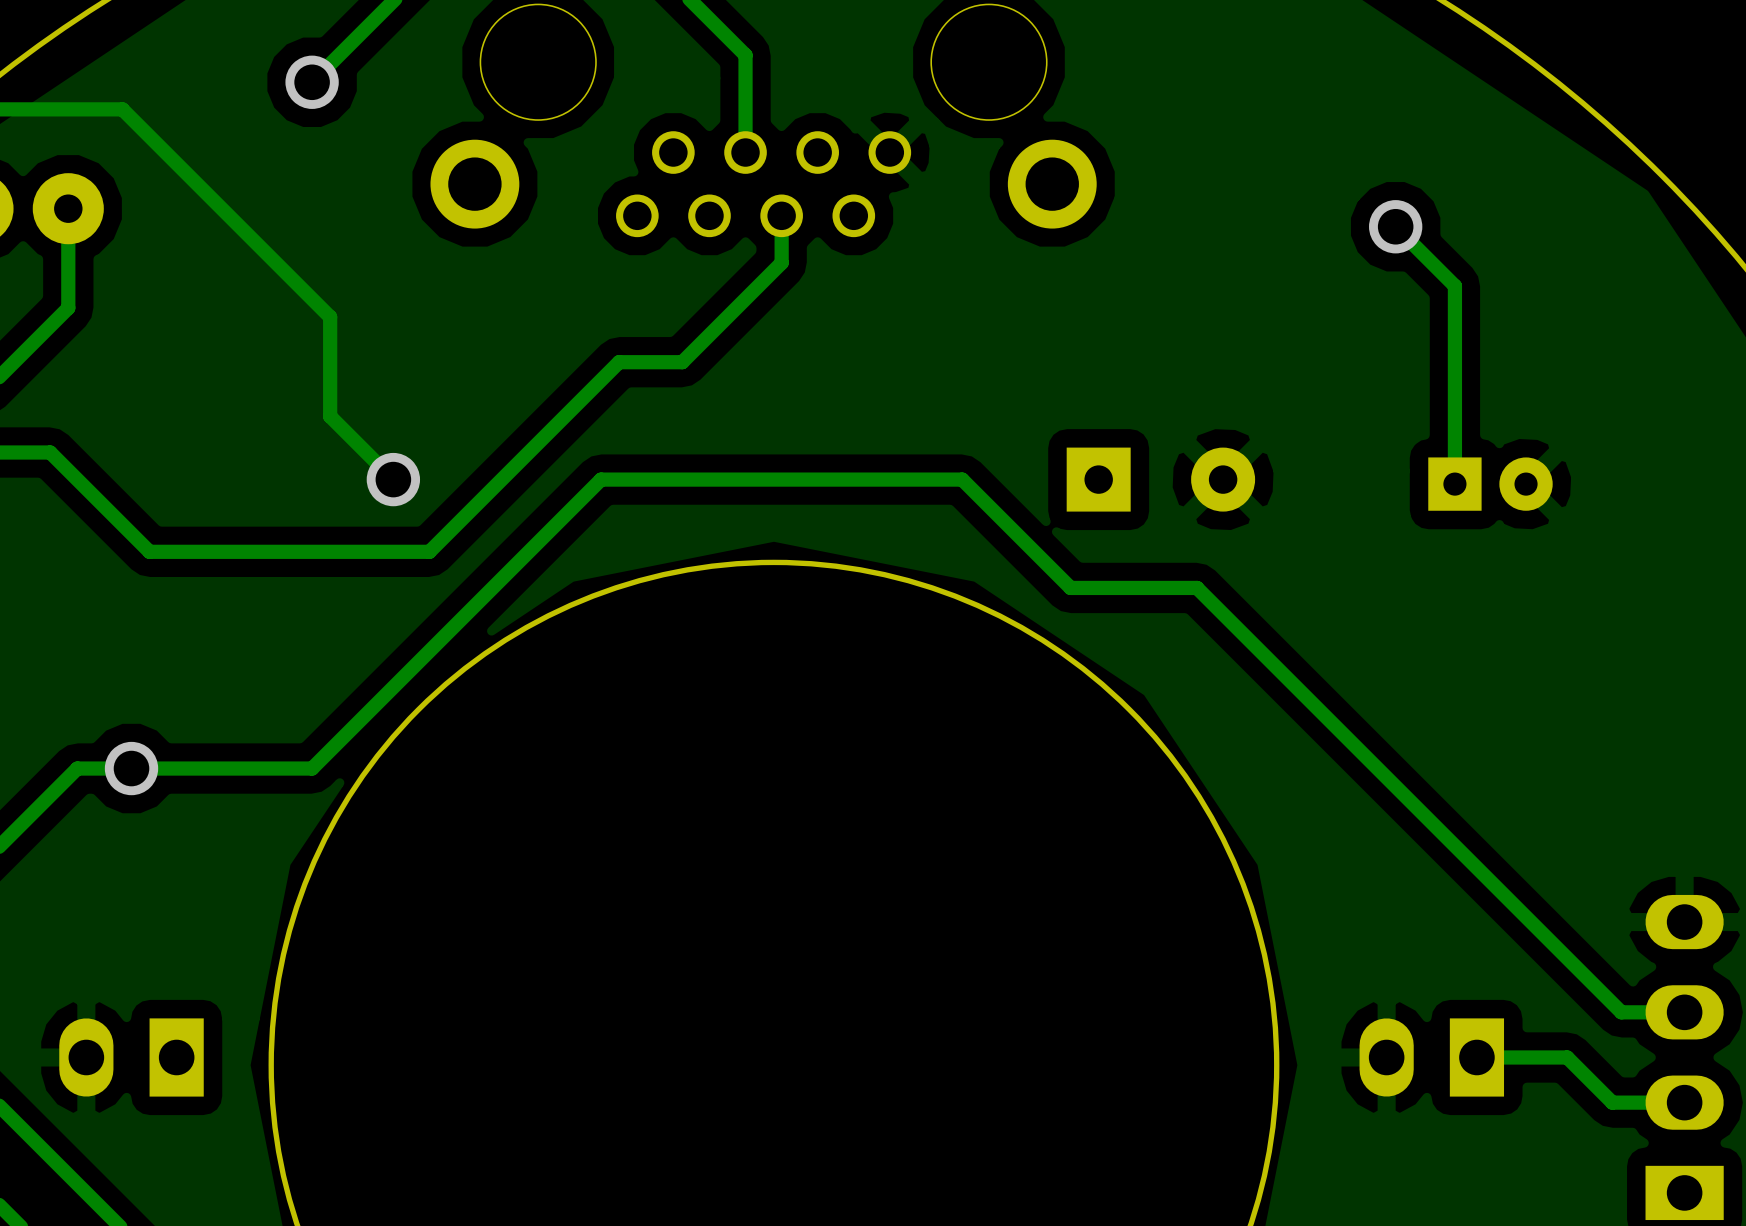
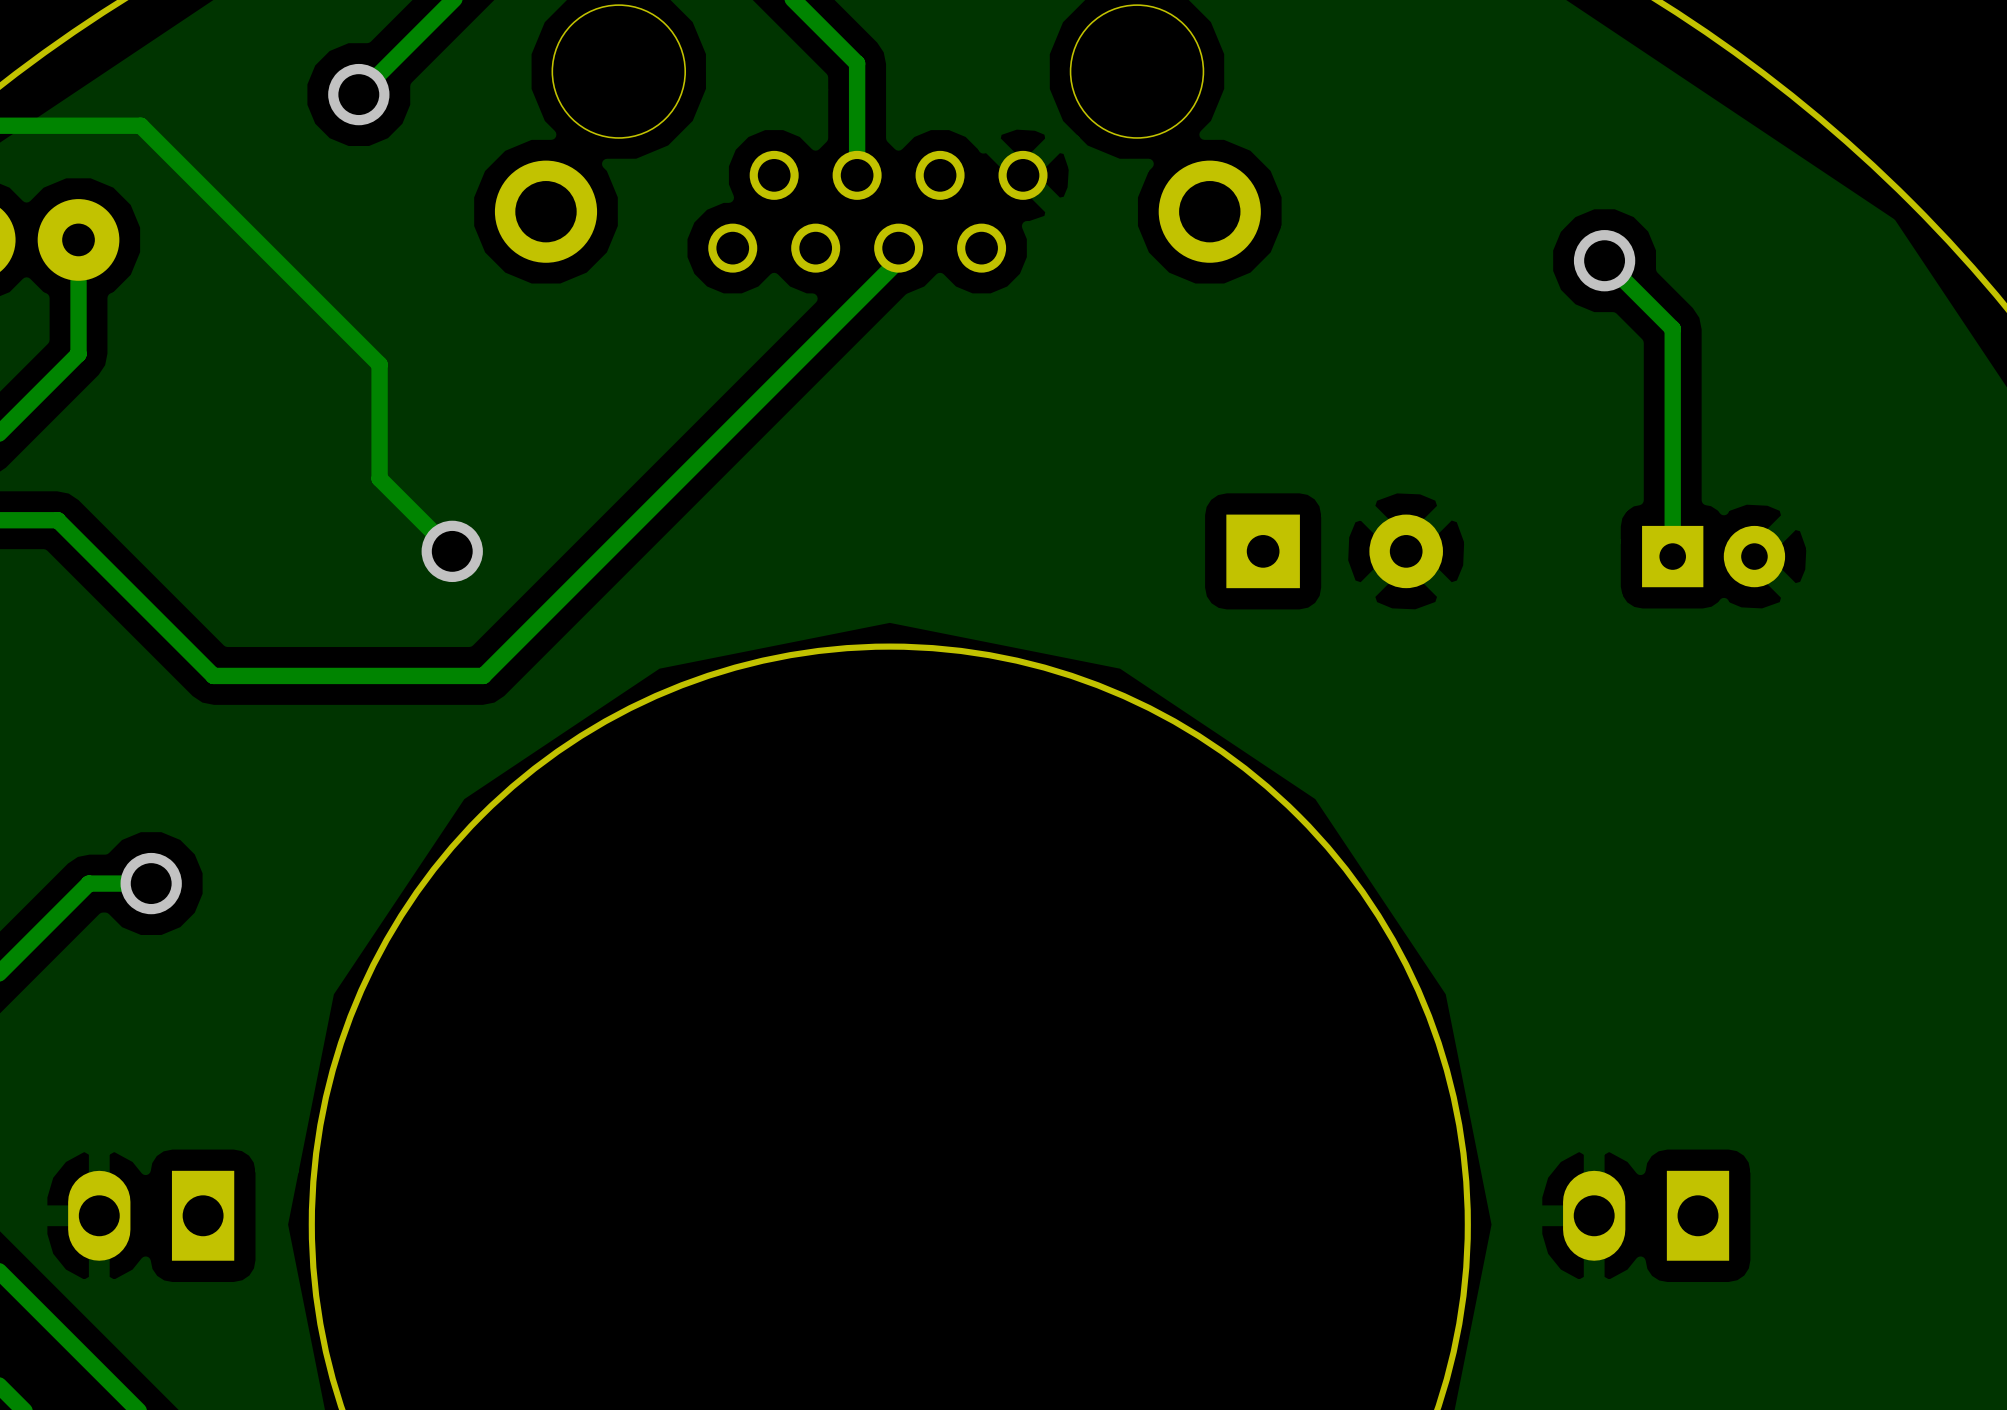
track: (781, 226) (781, 262) (682, 362) (619, 362) (429, 551) (149, 551) -> (898, 260) (483, 675) (213, 675) (171, 634)
track: (131, 768) (312, 768) (601, 479) (962, 479) (1070, 587) (1197, 587) (1621, 1012) (1684, 1012) -> none
track: (1476, 1057) (1567, 1057) (1612, 1102) (1684, 1102) -> none
part: (1684, 1057) -> none

